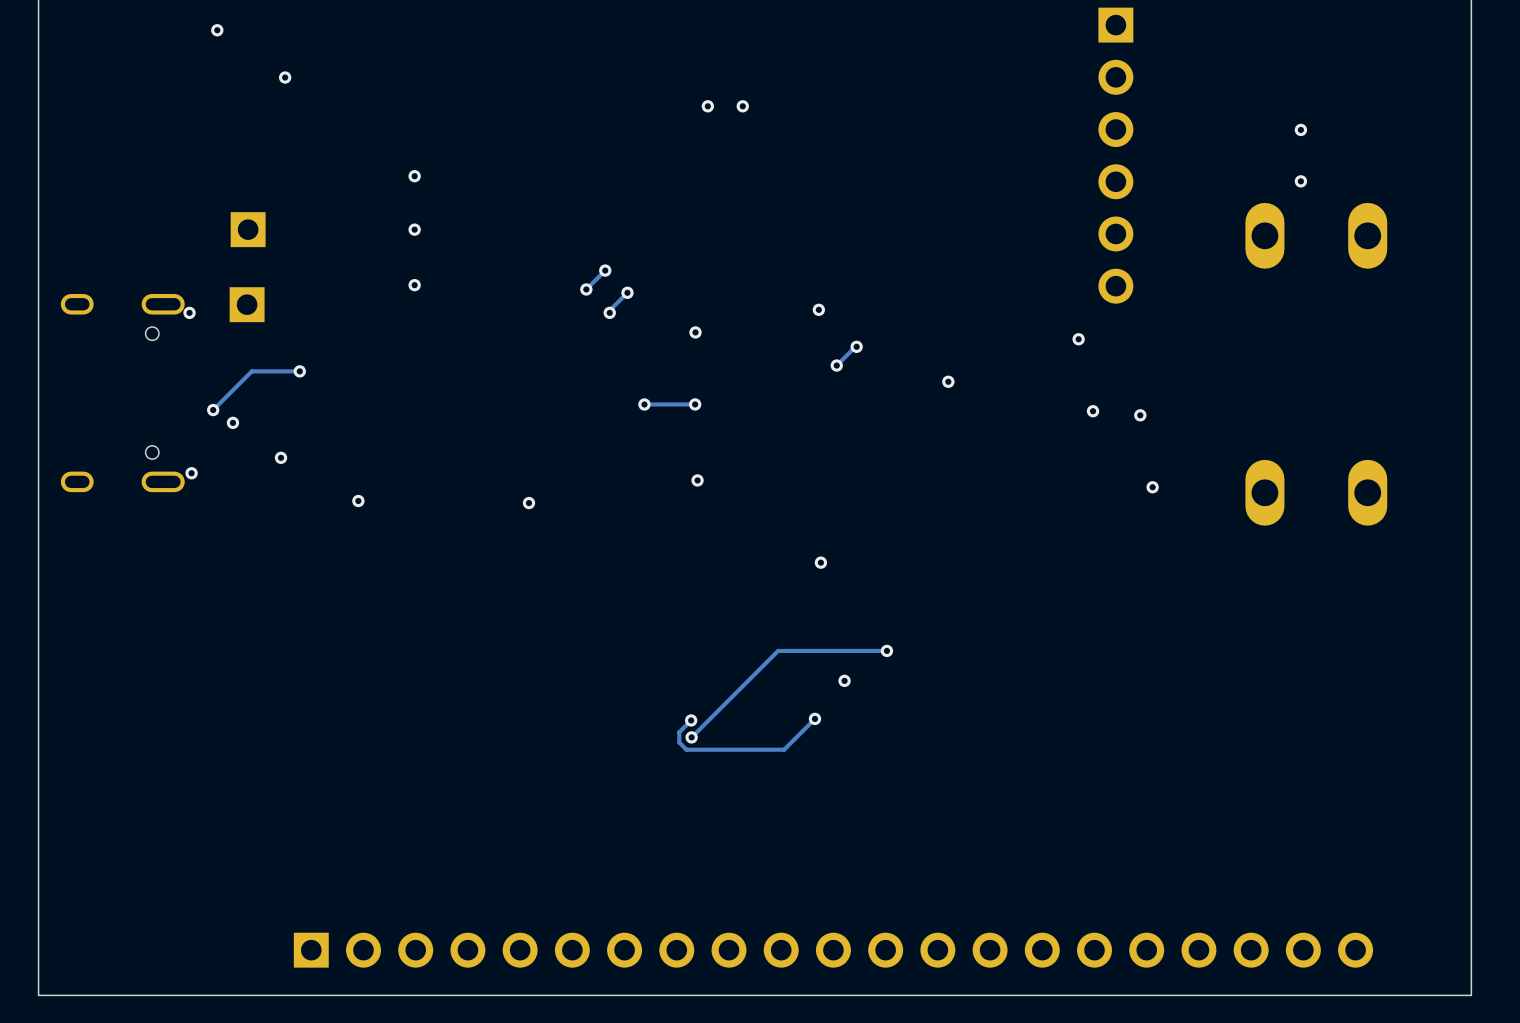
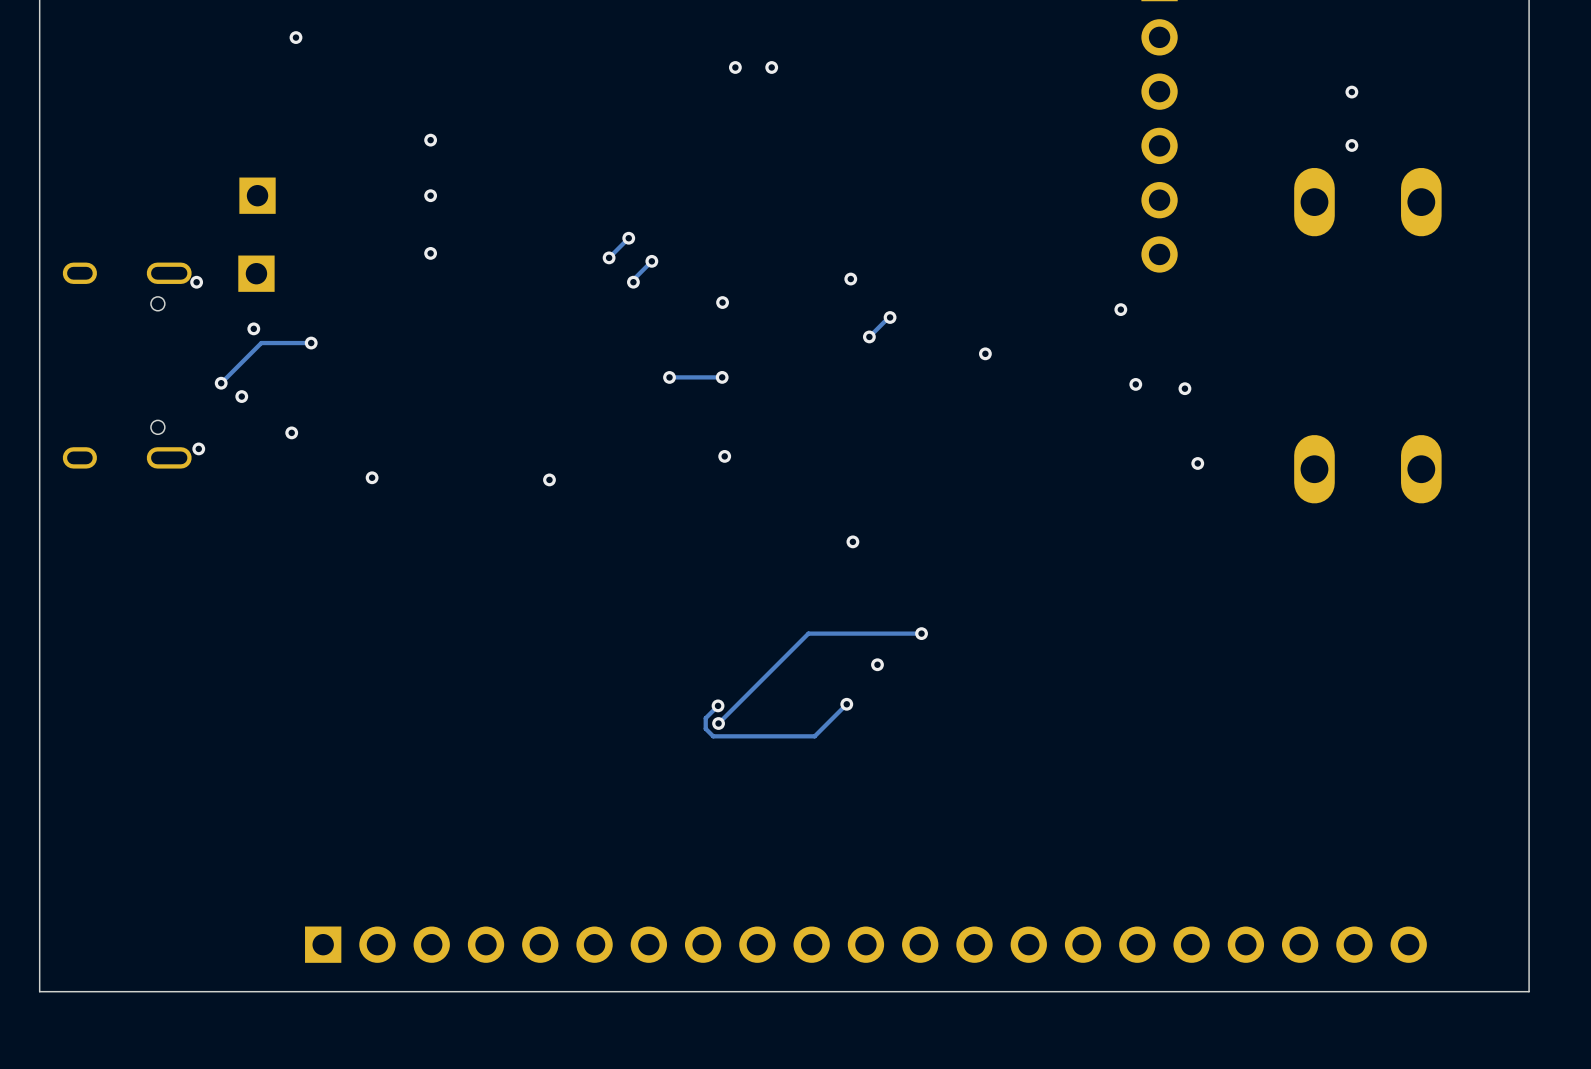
via: none -> (253, 328)

